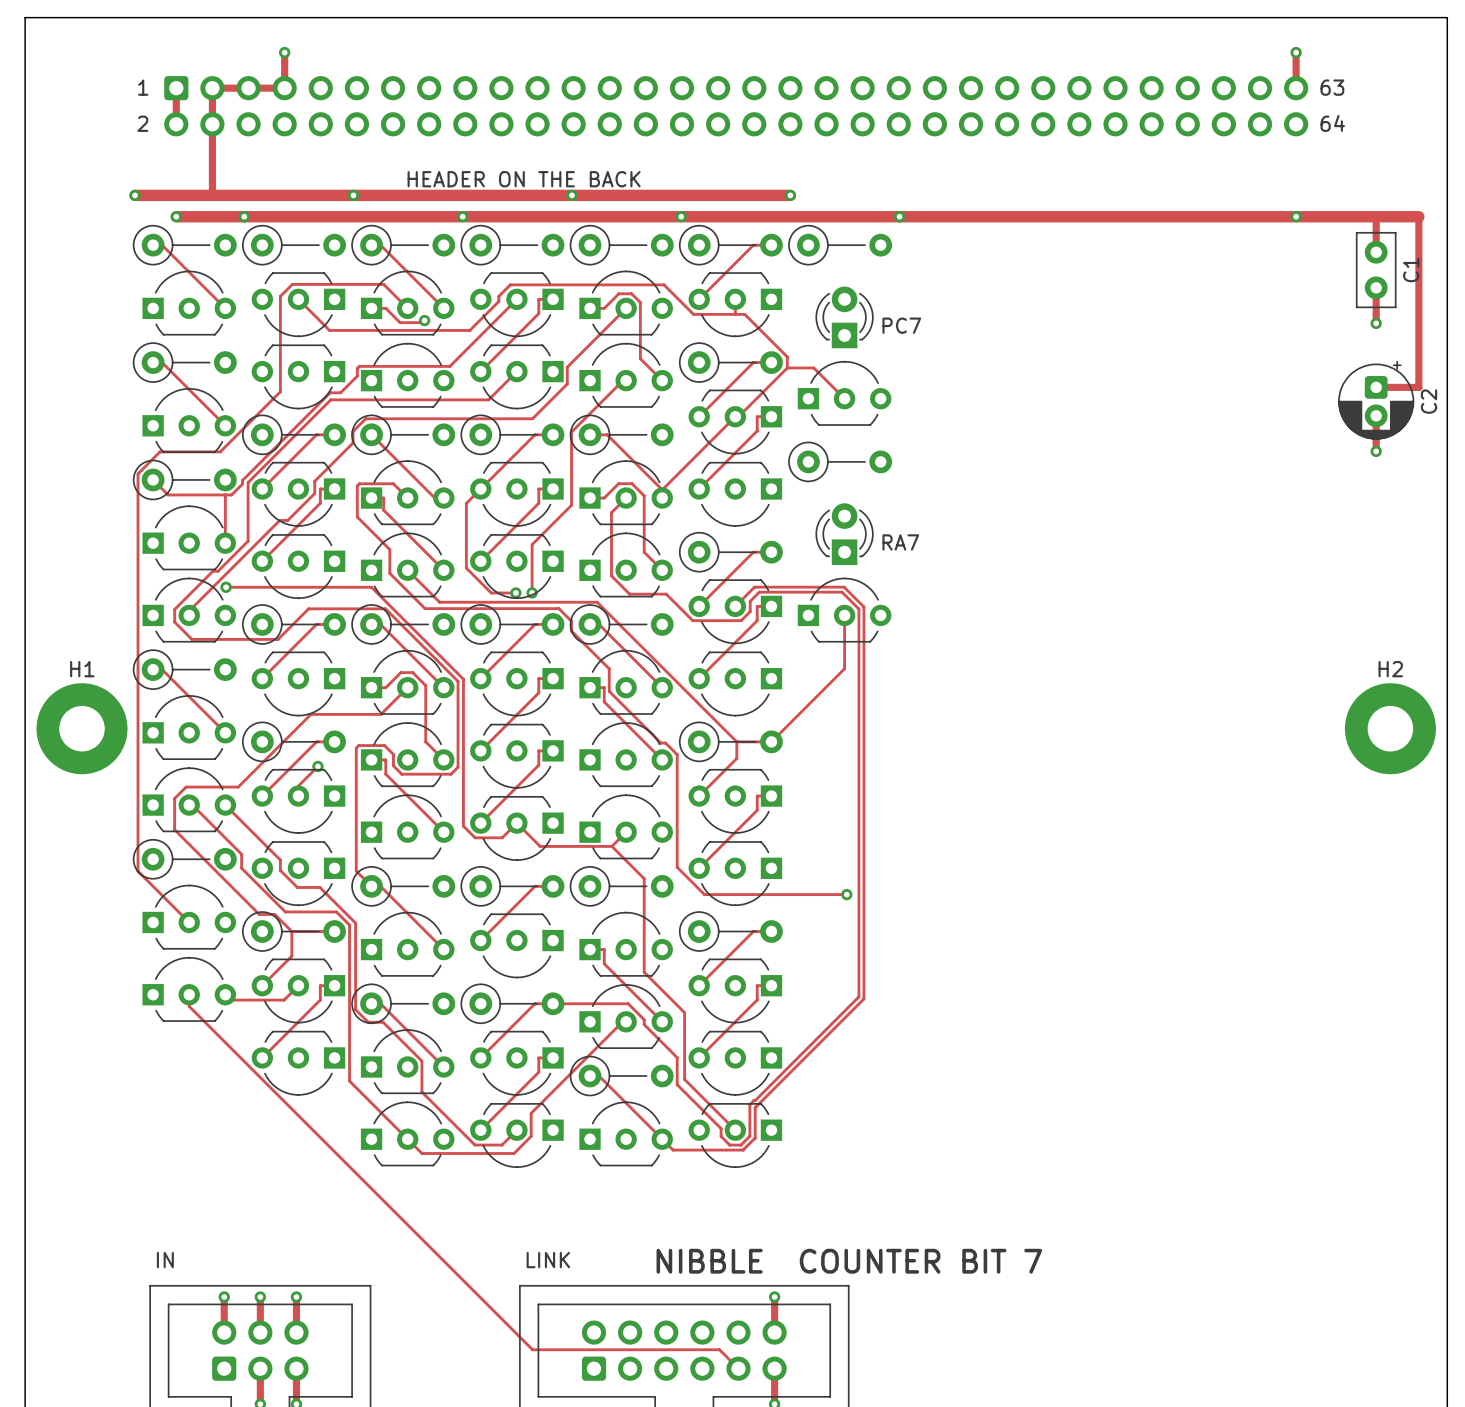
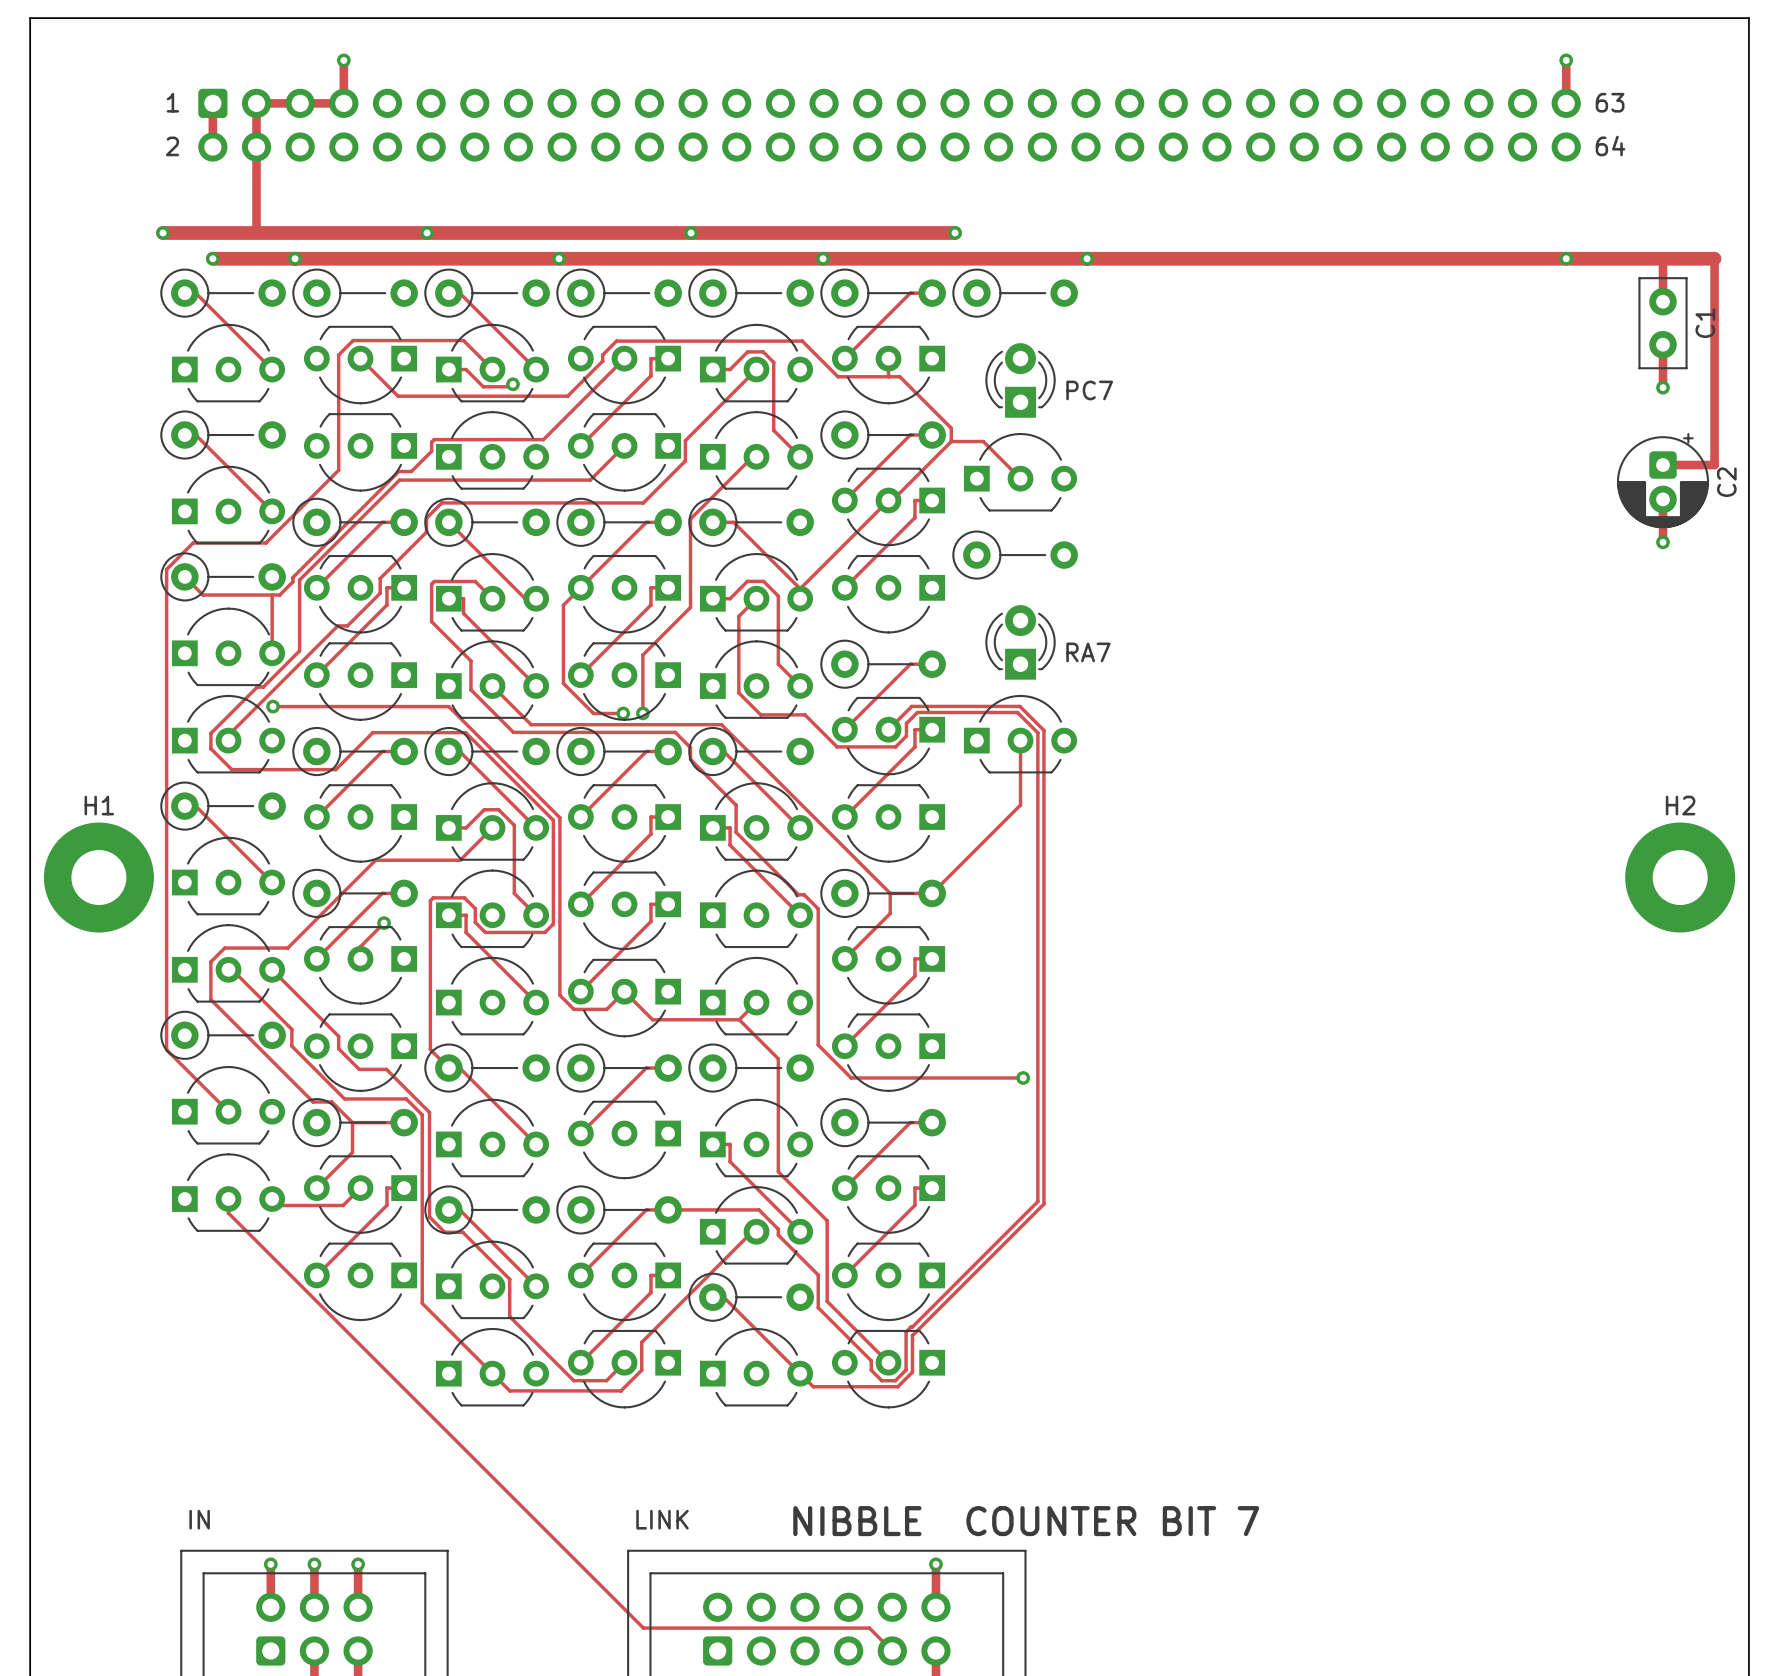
text: HEADER ON THE BACK (524, 179) -> none

